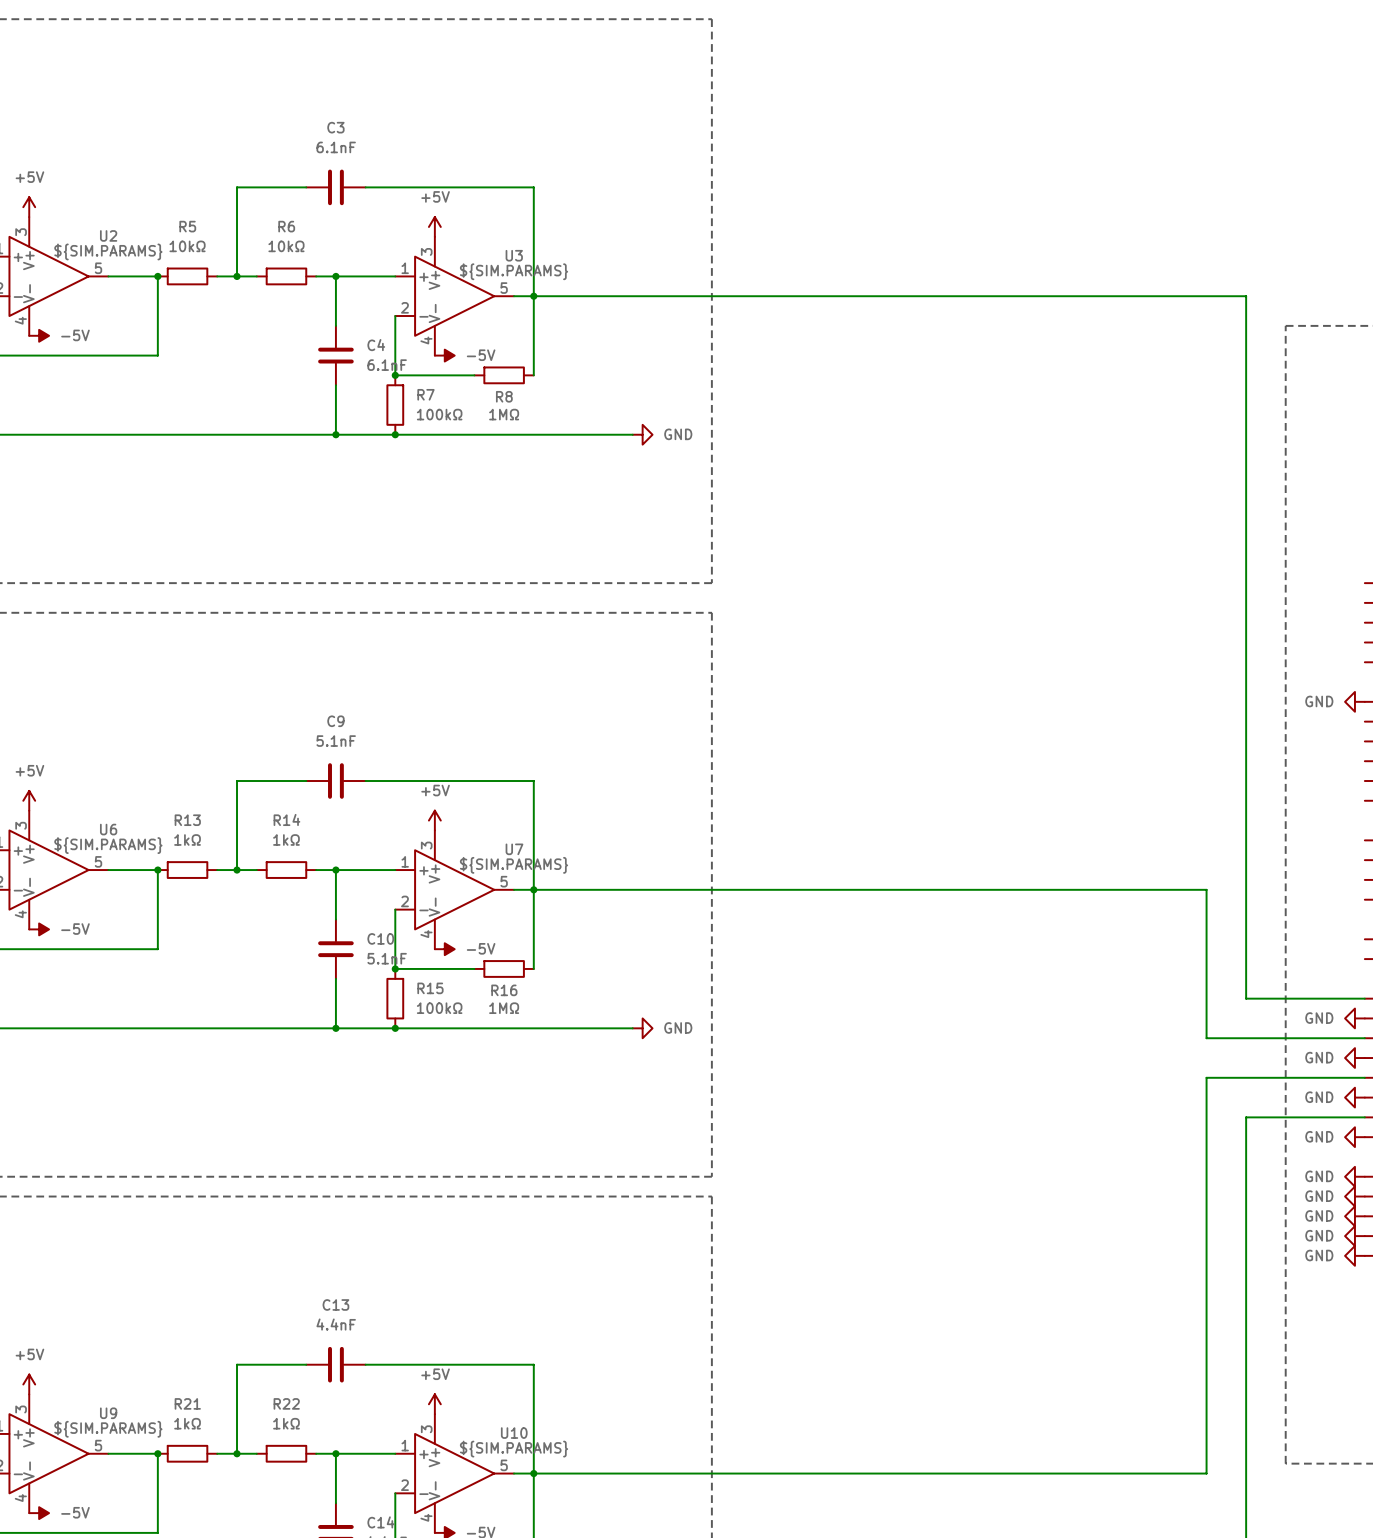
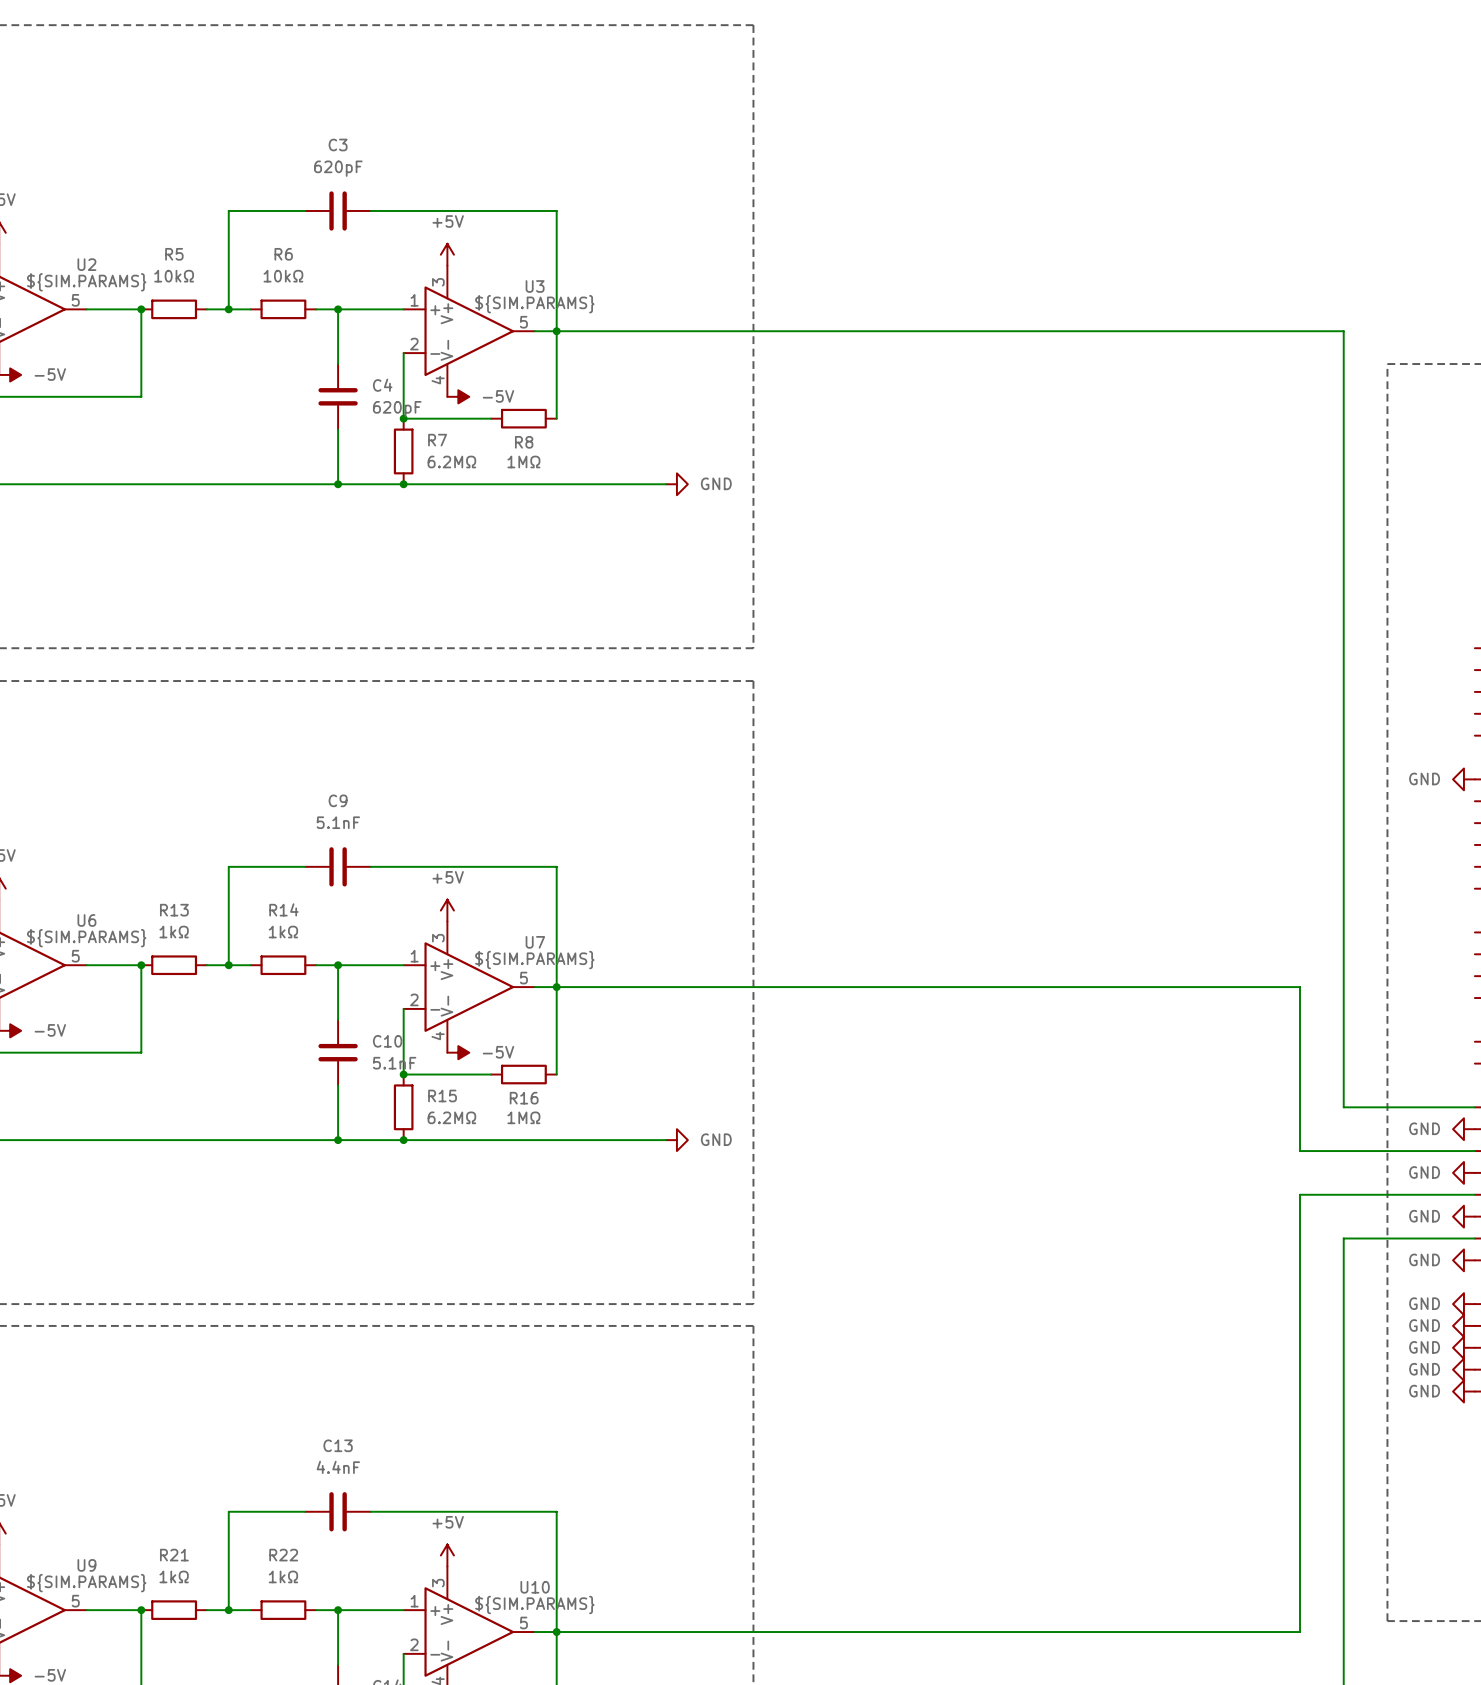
C3 value: 6.1nF (336, 147) -> 620pF (338, 168)
C4 value: 6.1nF (387, 365) -> 620pF (397, 409)
R7 value: 100kΩ (439, 414) -> 6.2MΩ (451, 461)
R15 value: 100kΩ (439, 1008) -> 6.2MΩ (451, 1117)

